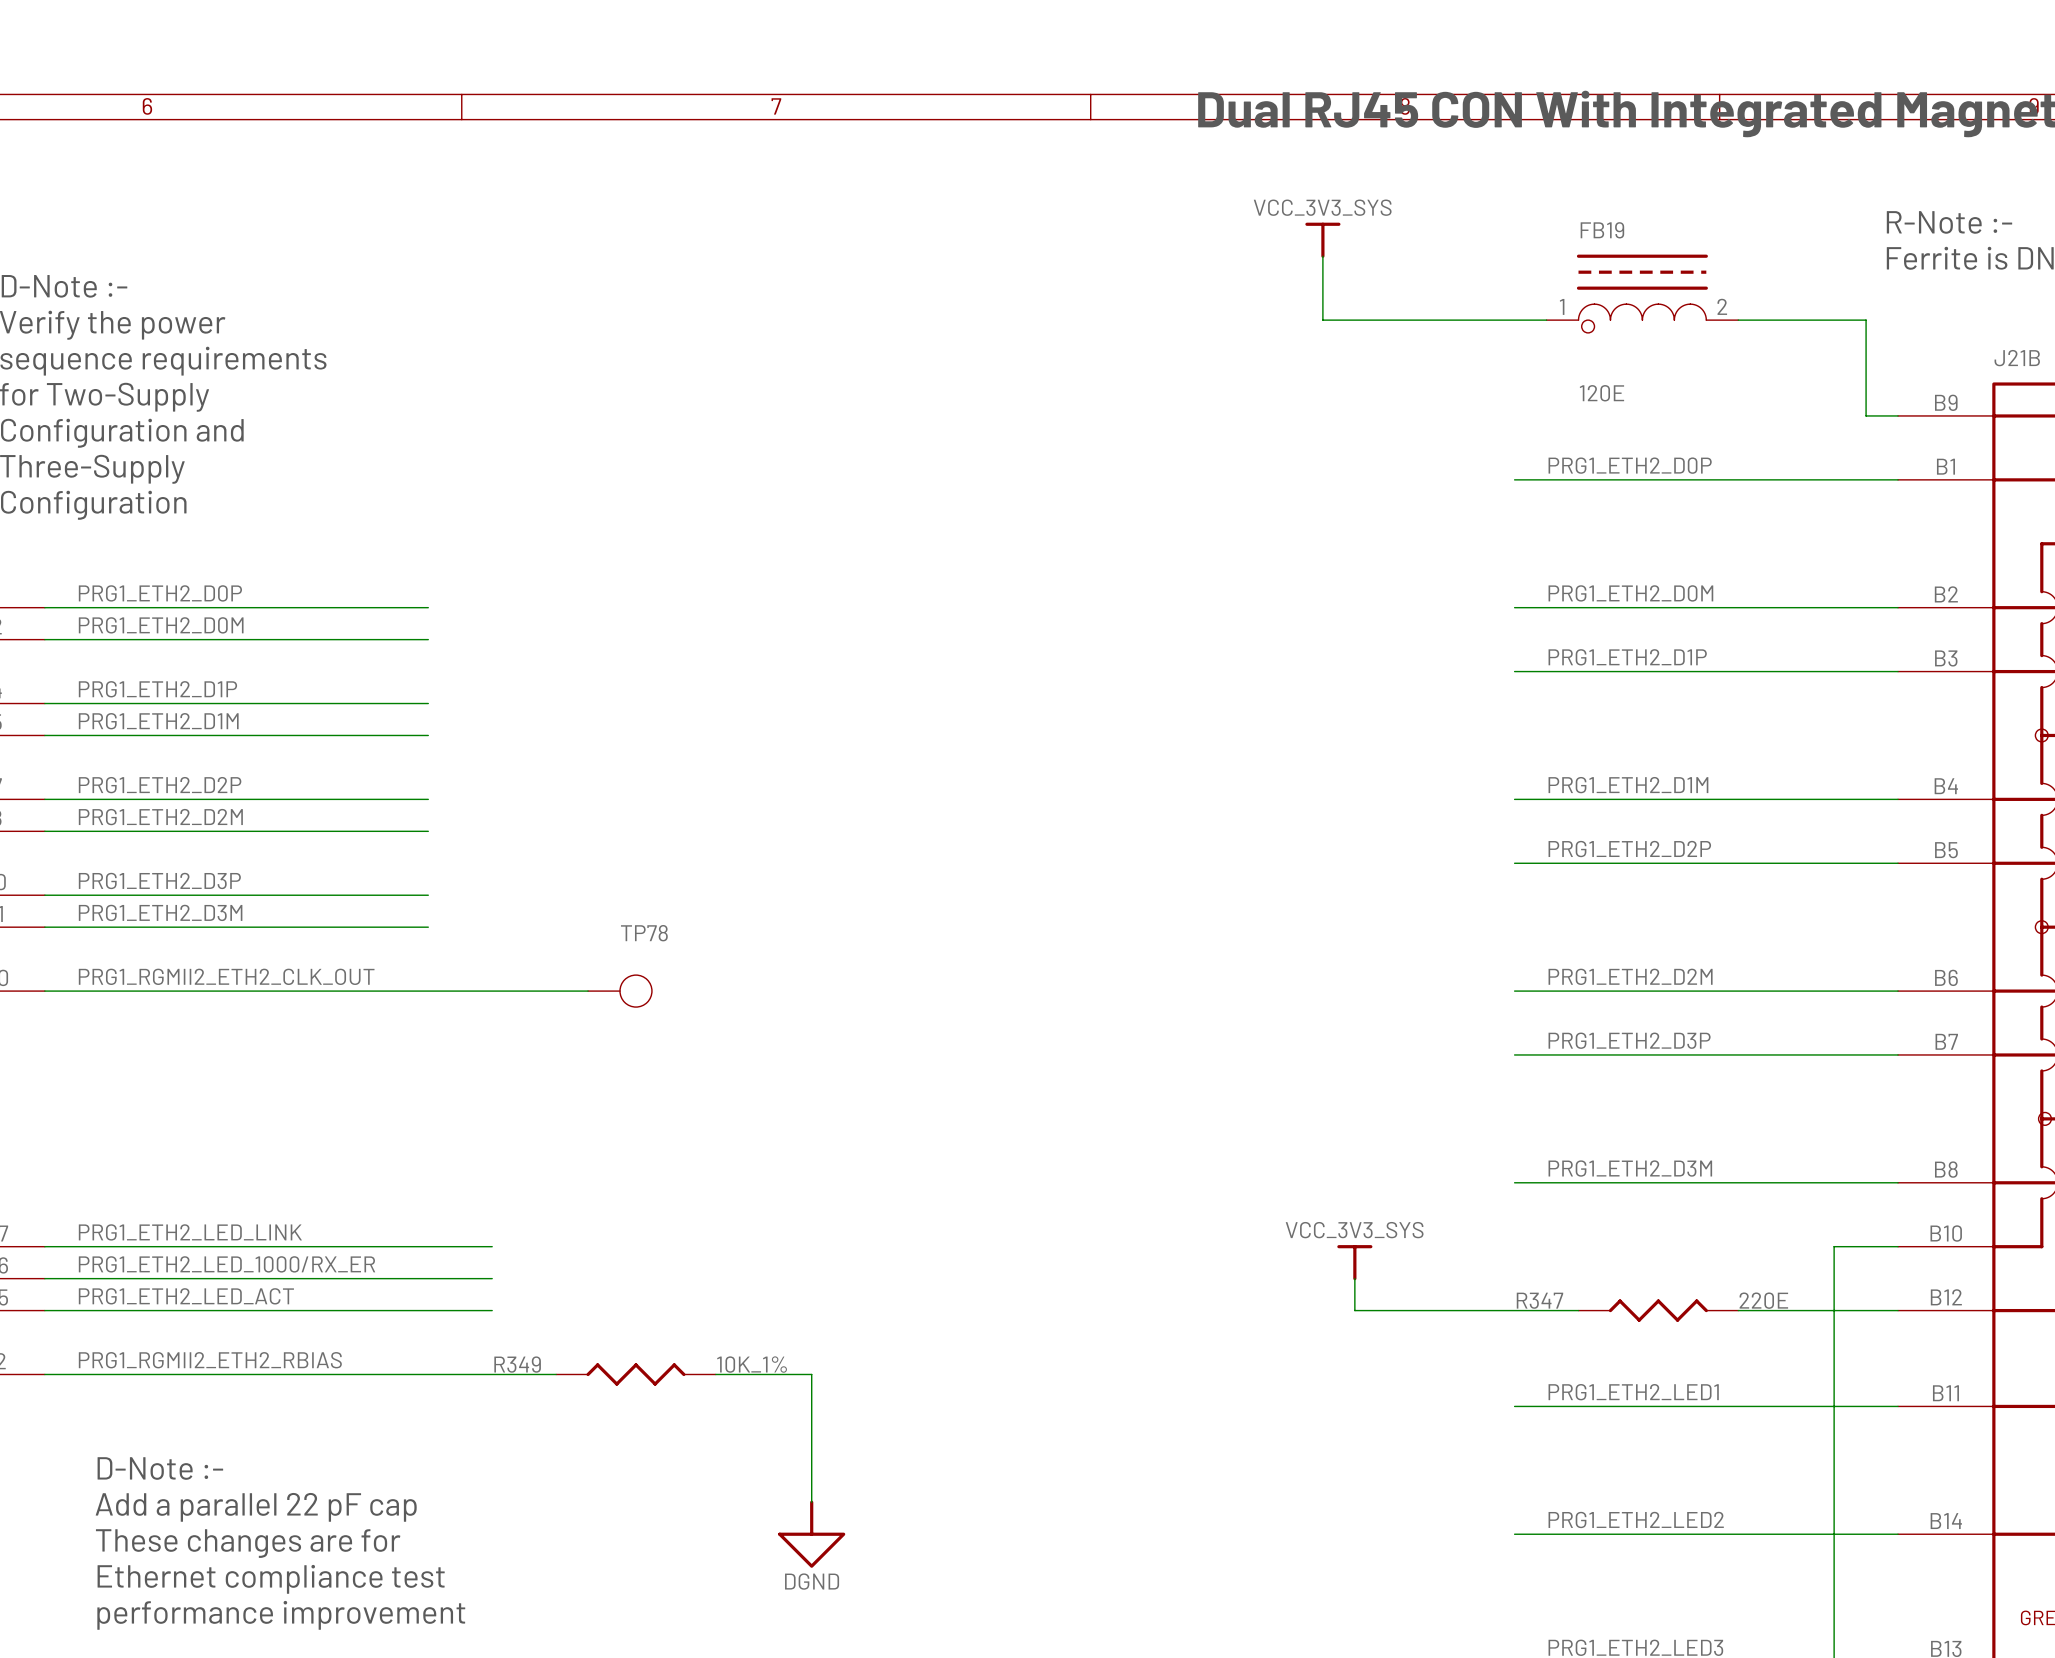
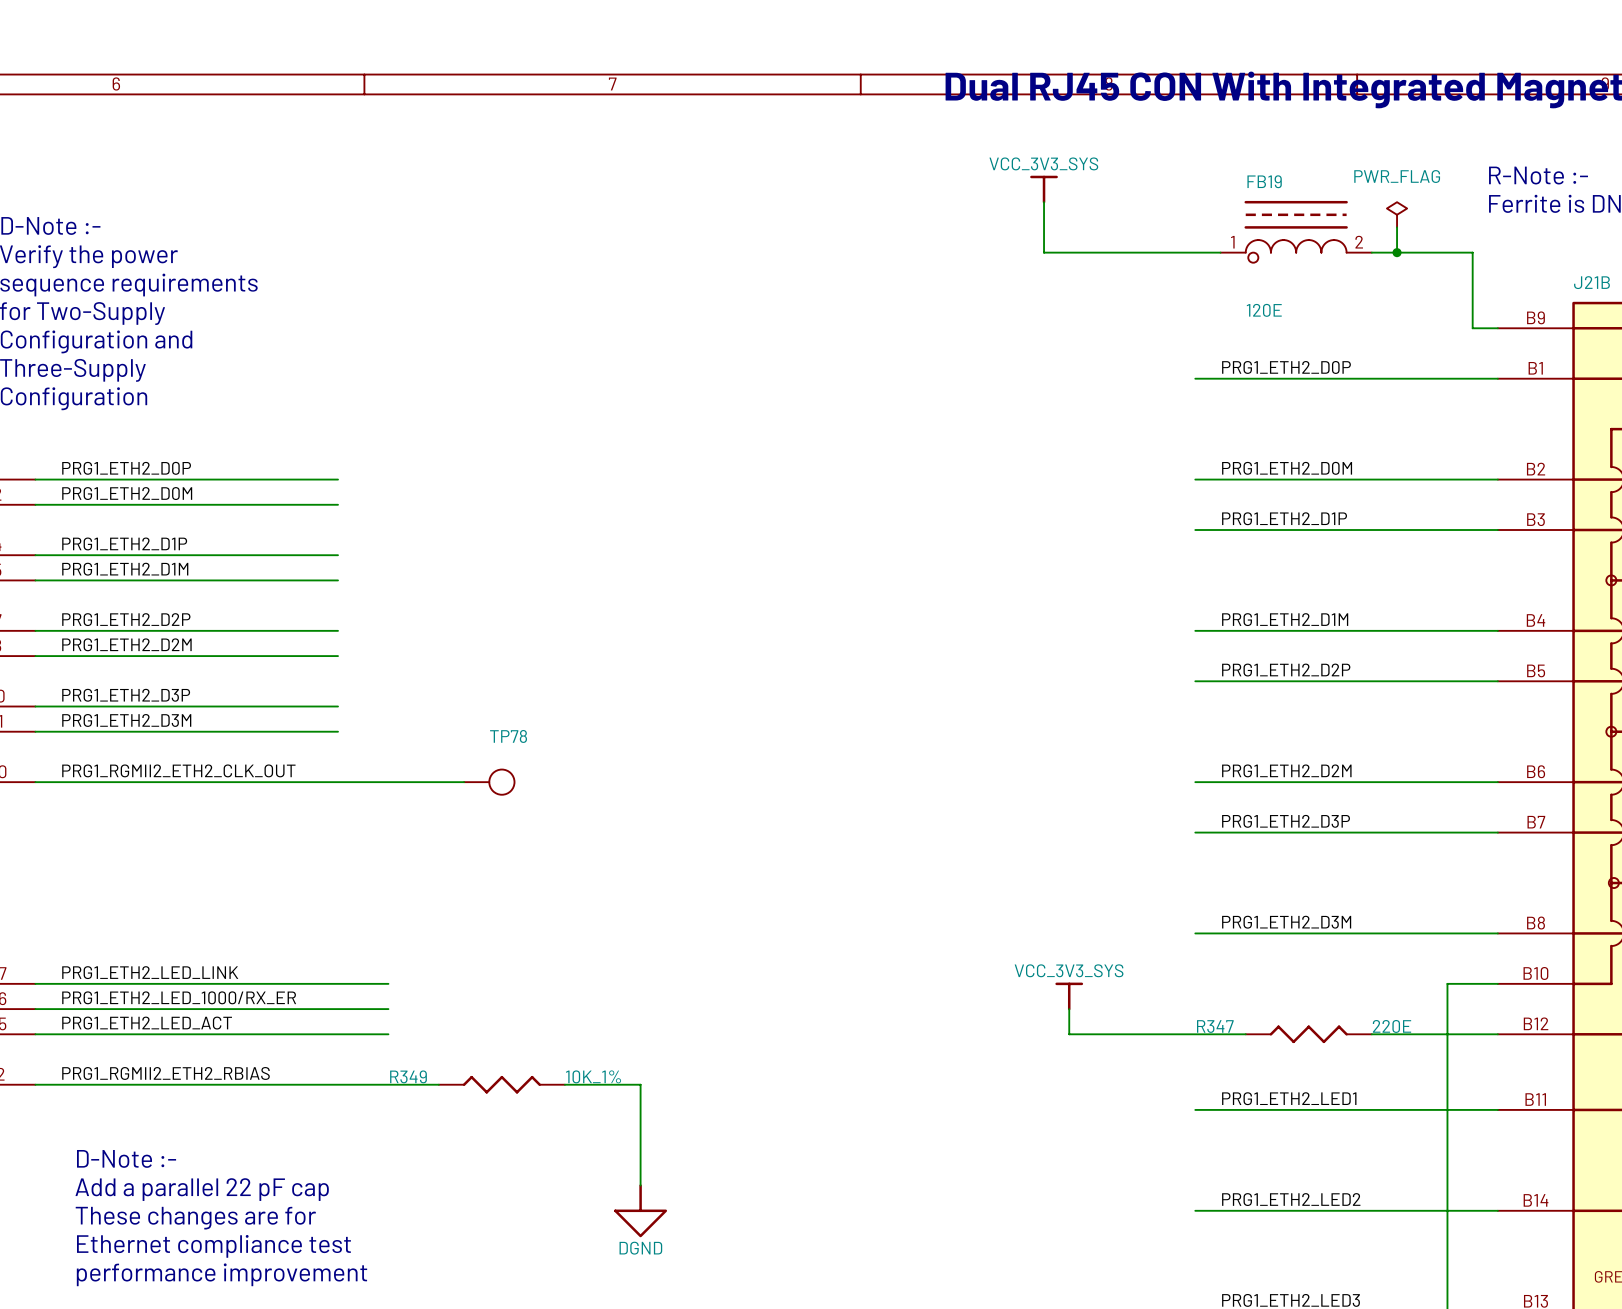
power symbol: none -> PWR_FLAG (1397, 214)
wire: none -> (1397, 227) (1397, 252)
junction: none -> (1397, 252)

